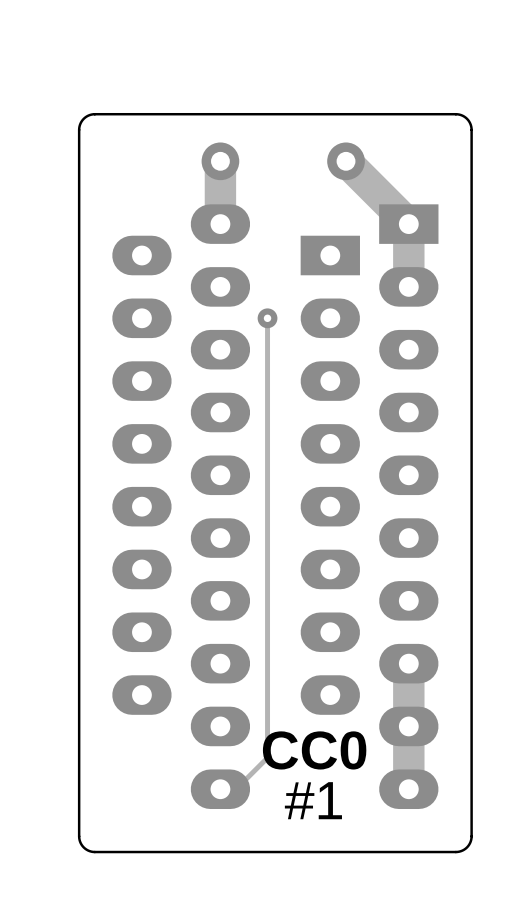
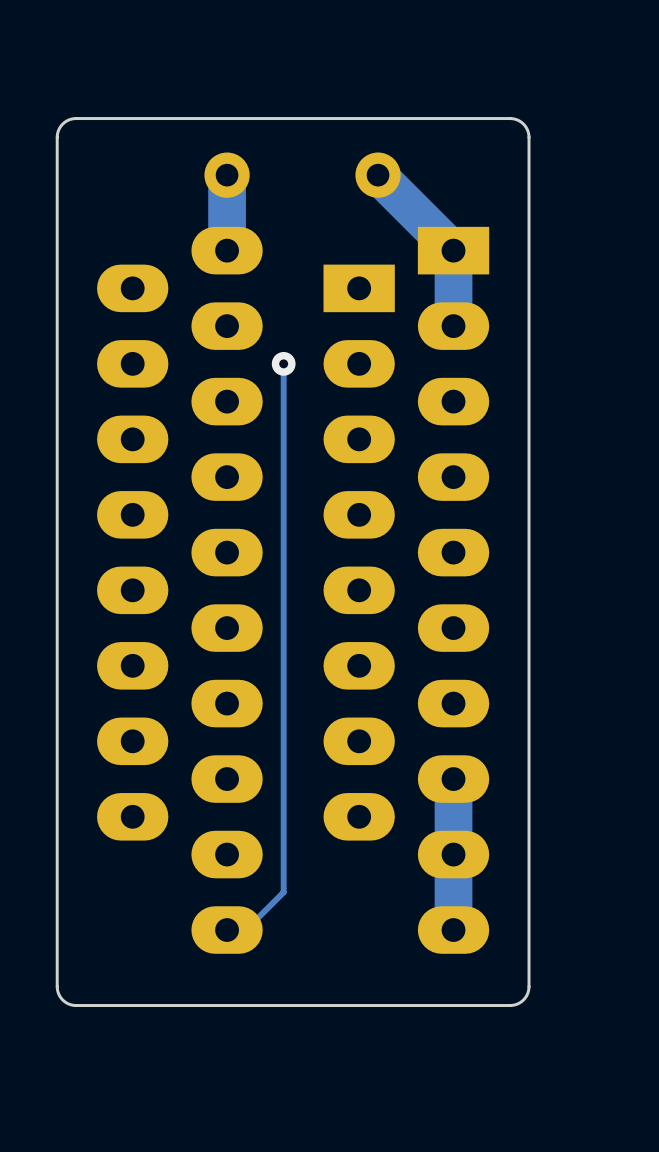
text: CC0 (314, 750) -> none
text: #1 (313, 800) -> none

